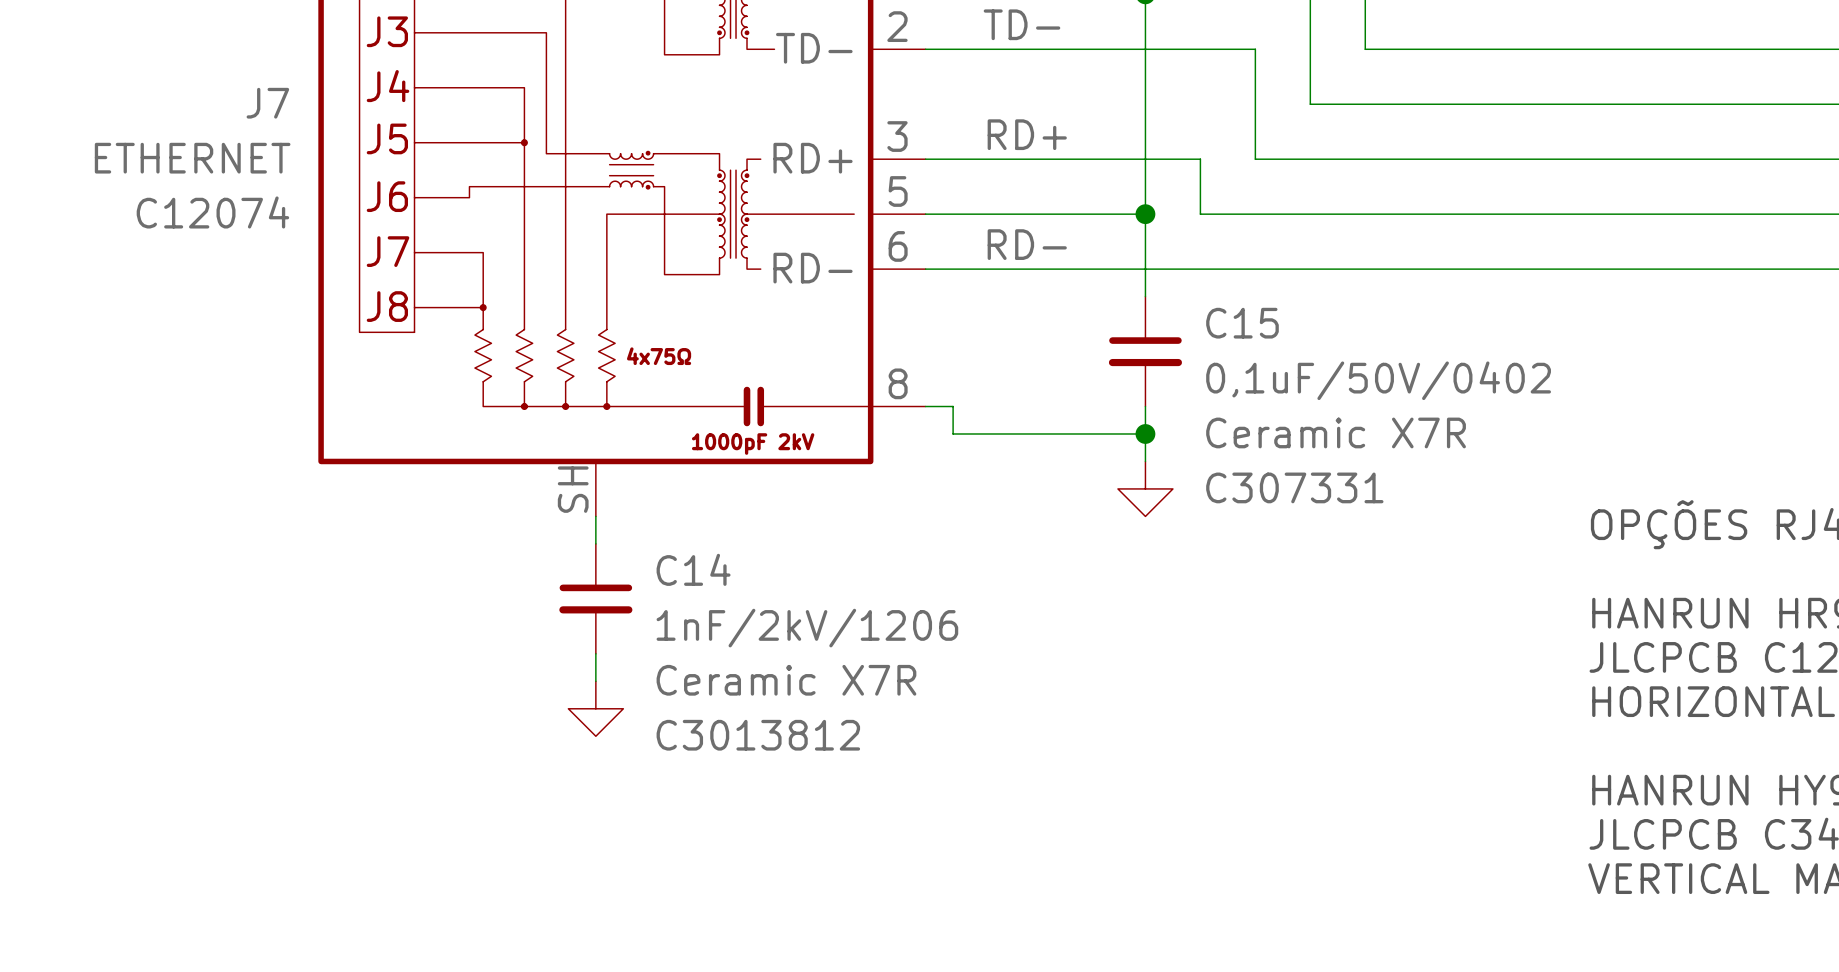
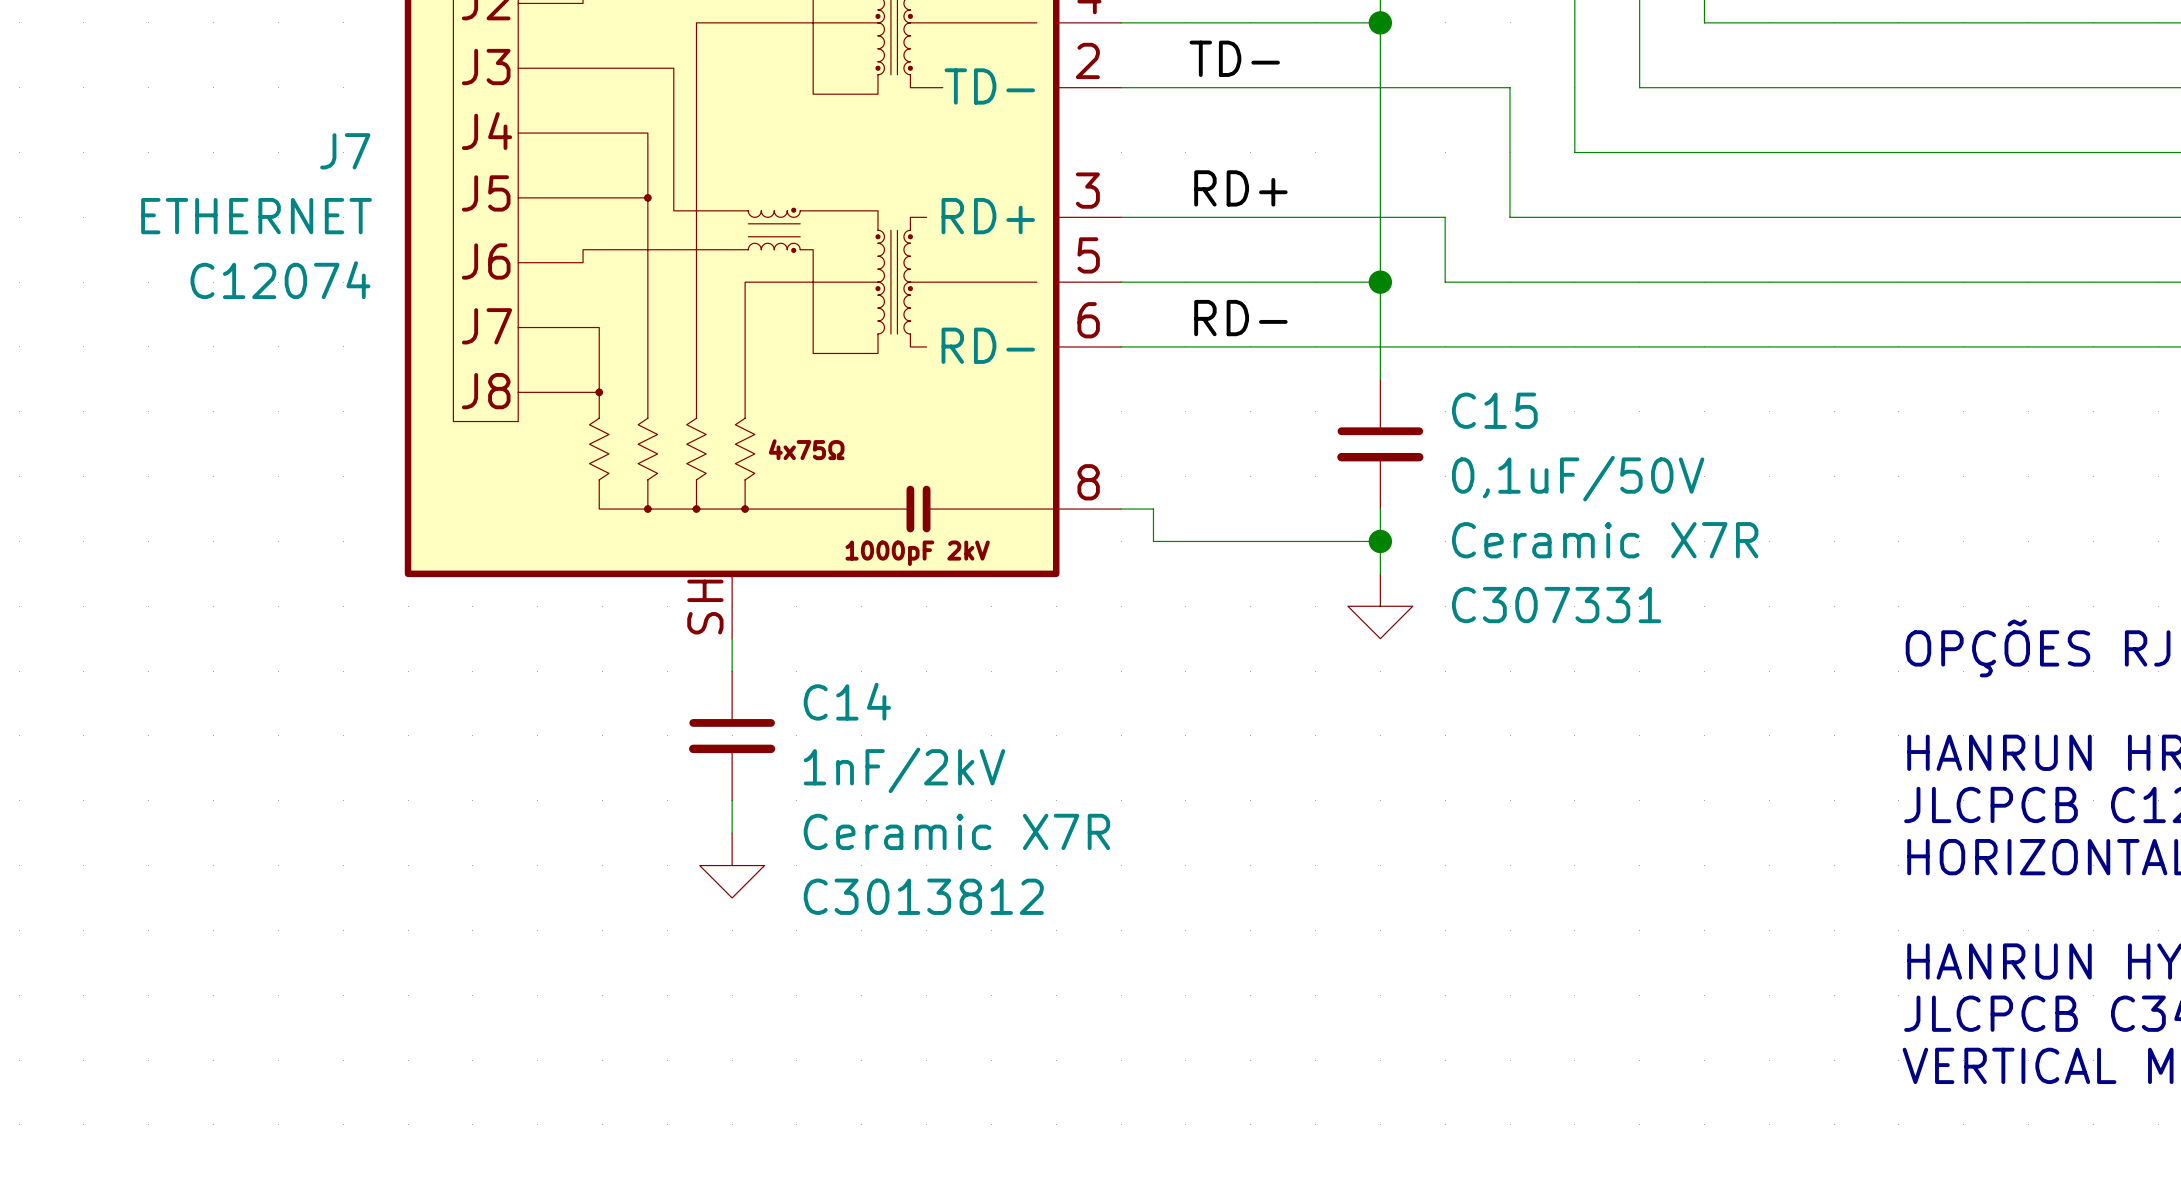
C15 value: 0,1uF/50V/0402 (1378, 380) -> 0,1uF/50V (1578, 478)
C14 value: 1nF/2kV/1206 (807, 628) -> 1nF/2kV (904, 770)

